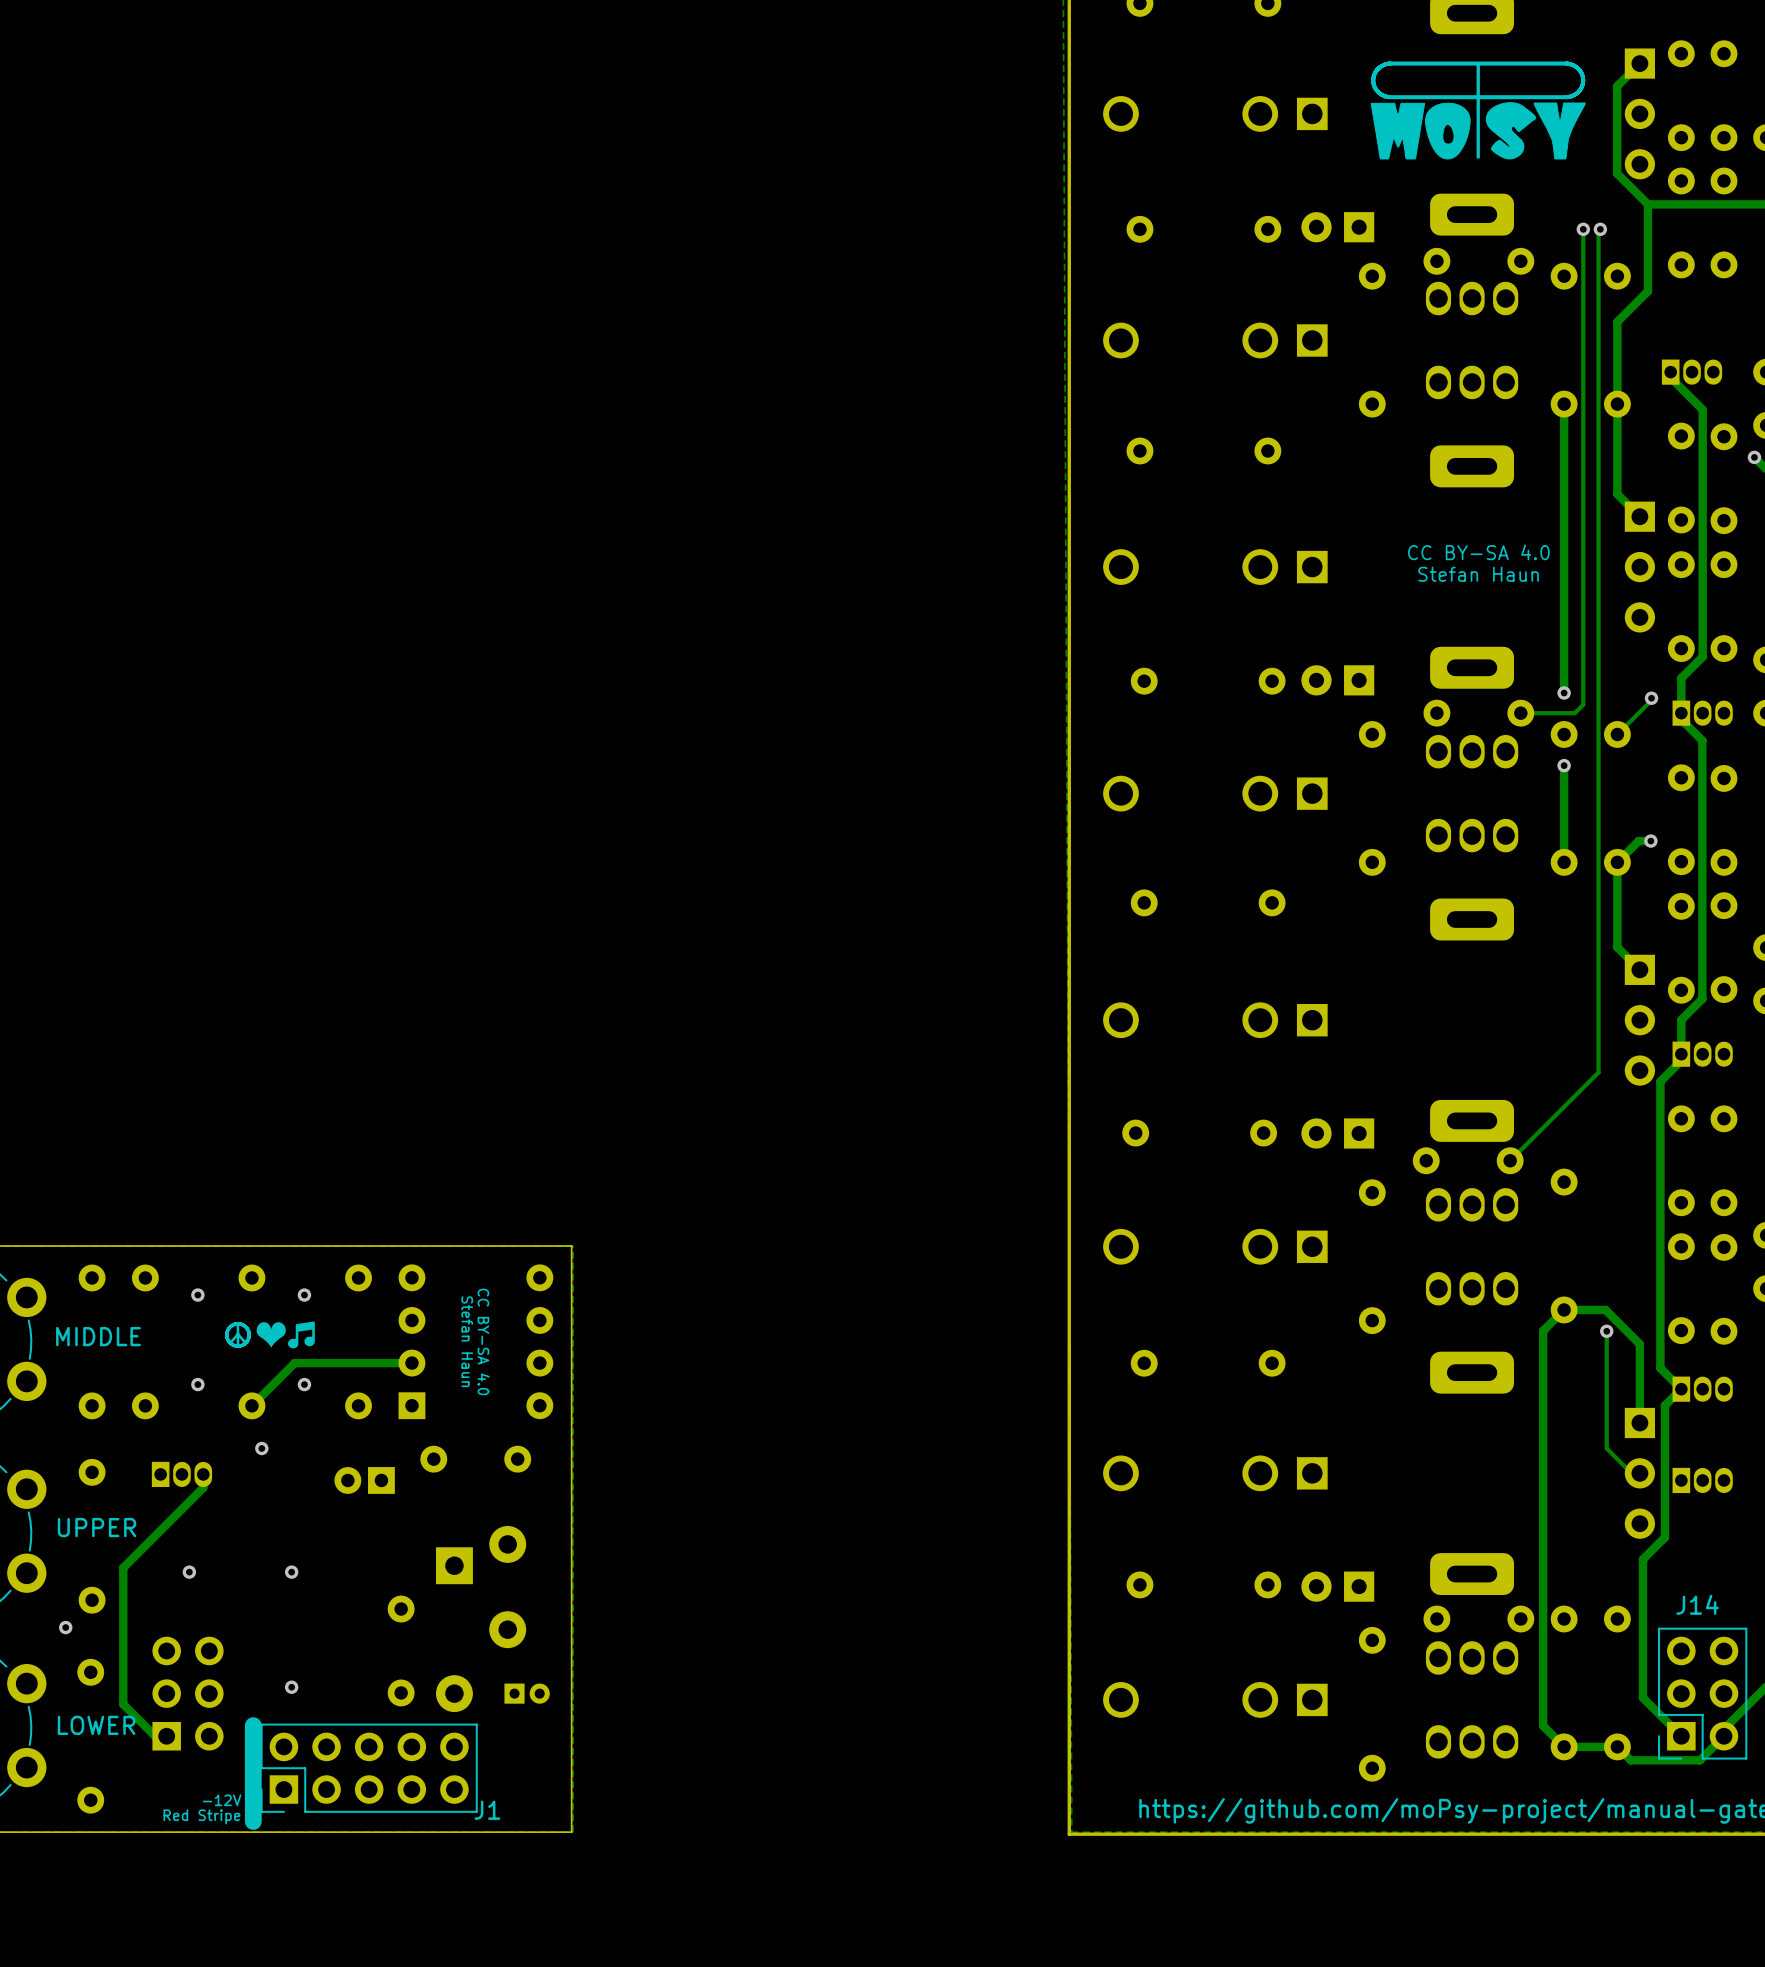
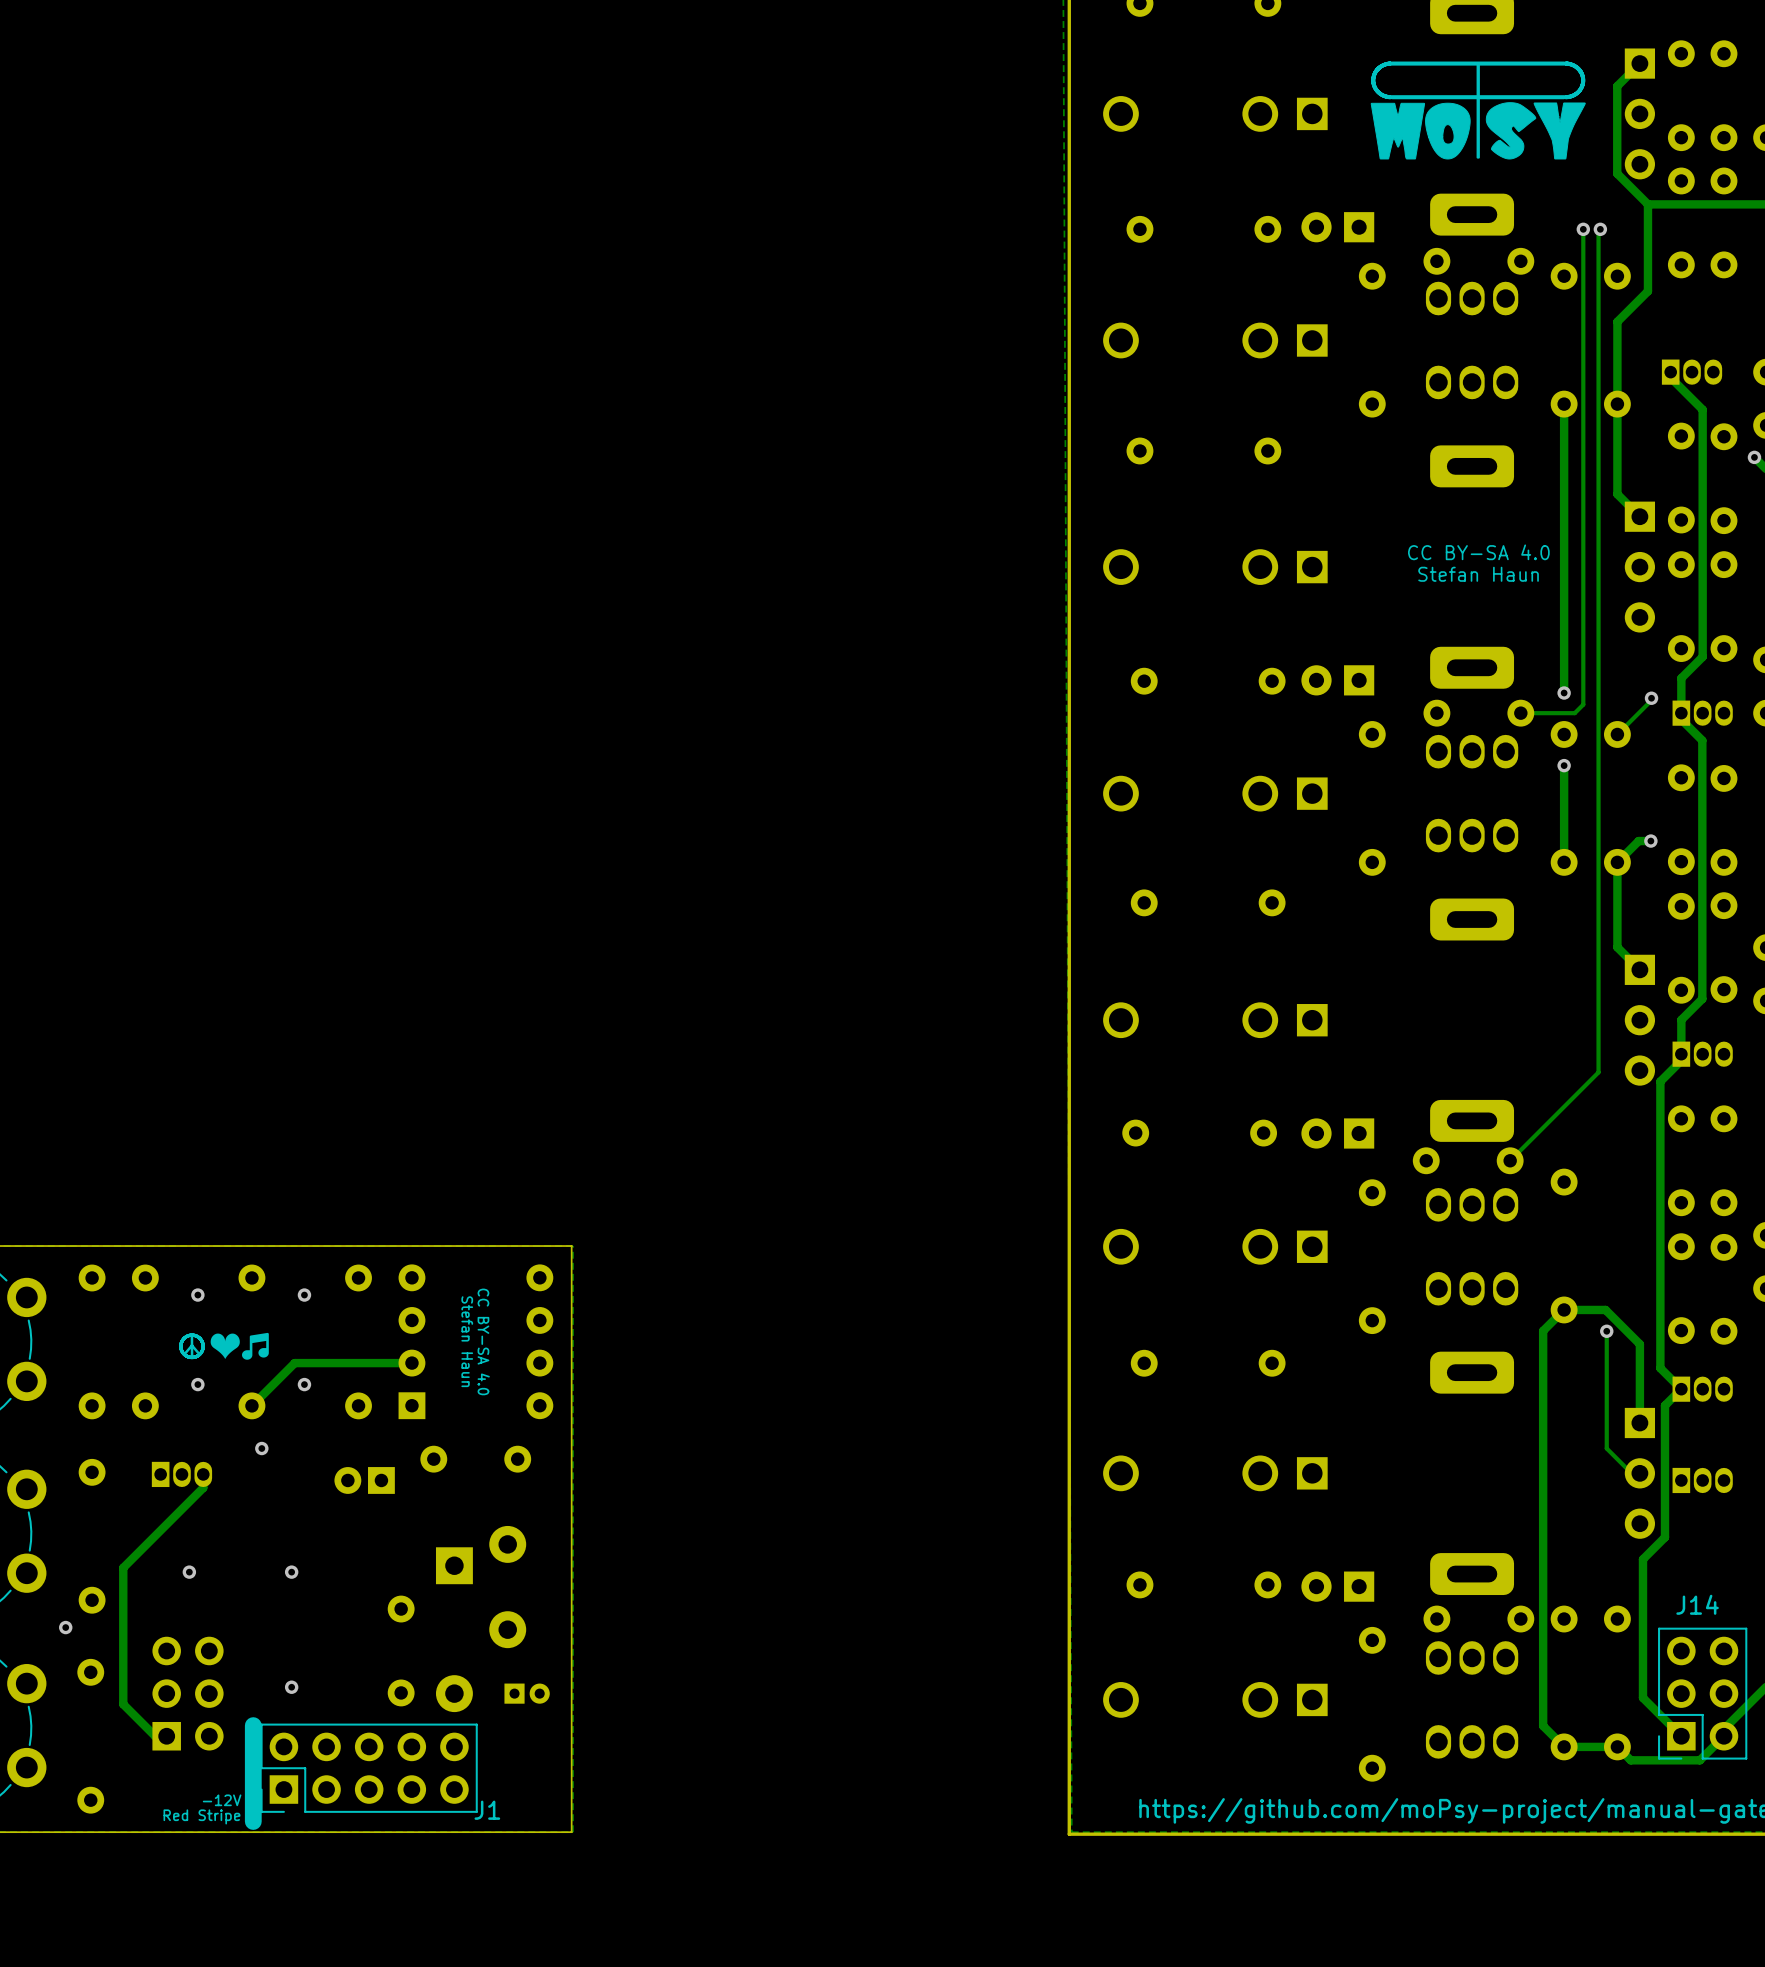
line: (239, 1323) (230, 1326) (226, 1333) (229, 1342) (236, 1346) (245, 1343) (249, 1336) (246, 1327) (239, 1323) -> (193, 1335) (185, 1337) (180, 1344) (183, 1352) (190, 1357) (198, 1355) (203, 1348) (200, 1339) (193, 1335)
line: (237, 1324) (238, 1345) -> (191, 1336) (192, 1356)
line: (237, 1333) (245, 1342) -> (191, 1345) (199, 1353)
line: (238, 1333) (230, 1342) -> (192, 1345) (184, 1353)
drawing position: (271, 1334) -> (225, 1346)
drawing position: (301, 1334) -> (255, 1346)
text: MIDDLE (98, 1336) -> none
text: UPPER (96, 1527) -> none
text: LOWER (96, 1725) -> none

